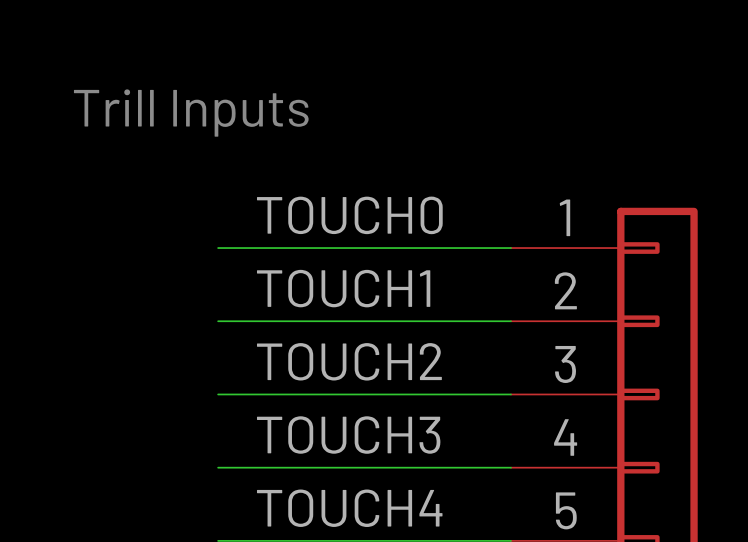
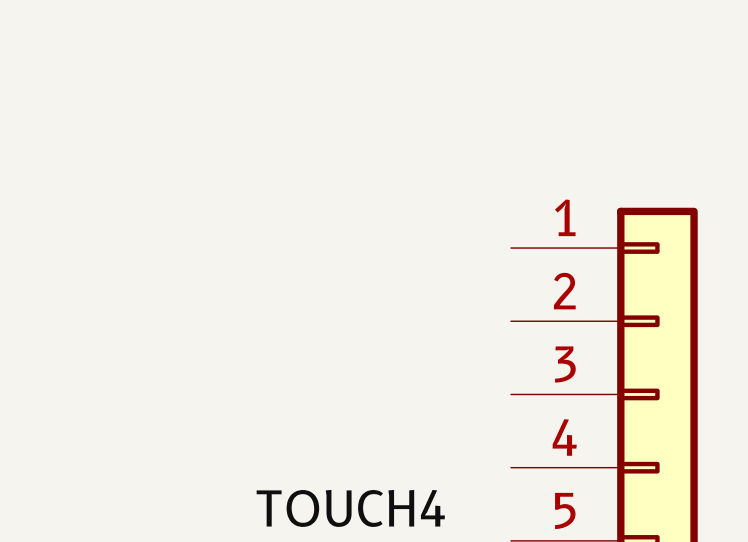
text: Trill Inputs (191, 113) -> none
label: TOUCH0 (349, 215) -> none
wire: (218, 248) (510, 248) -> none
label: TOUCH1 (343, 288) -> none
wire: (218, 321) (510, 321) -> none
label: TOUCH2 (349, 361) -> none
wire: (218, 394) (510, 394) -> none
label: TOUCH3 (348, 435) -> none
wire: (218, 467) (510, 467) -> none
wire: (218, 540) (510, 540) -> none

